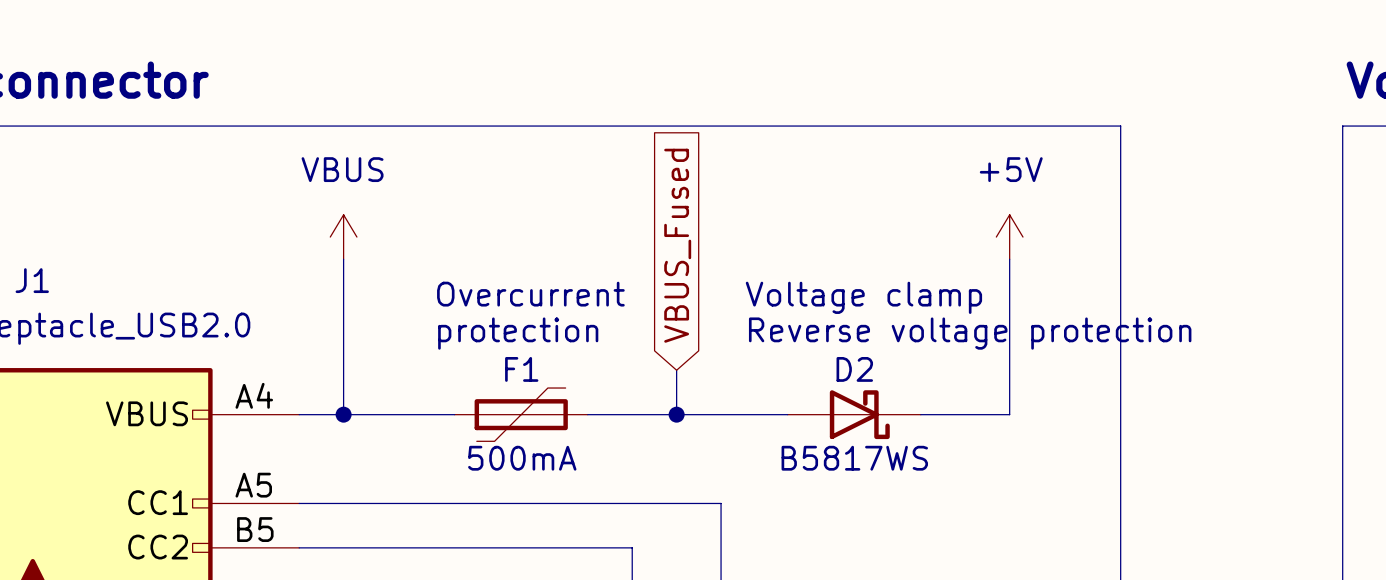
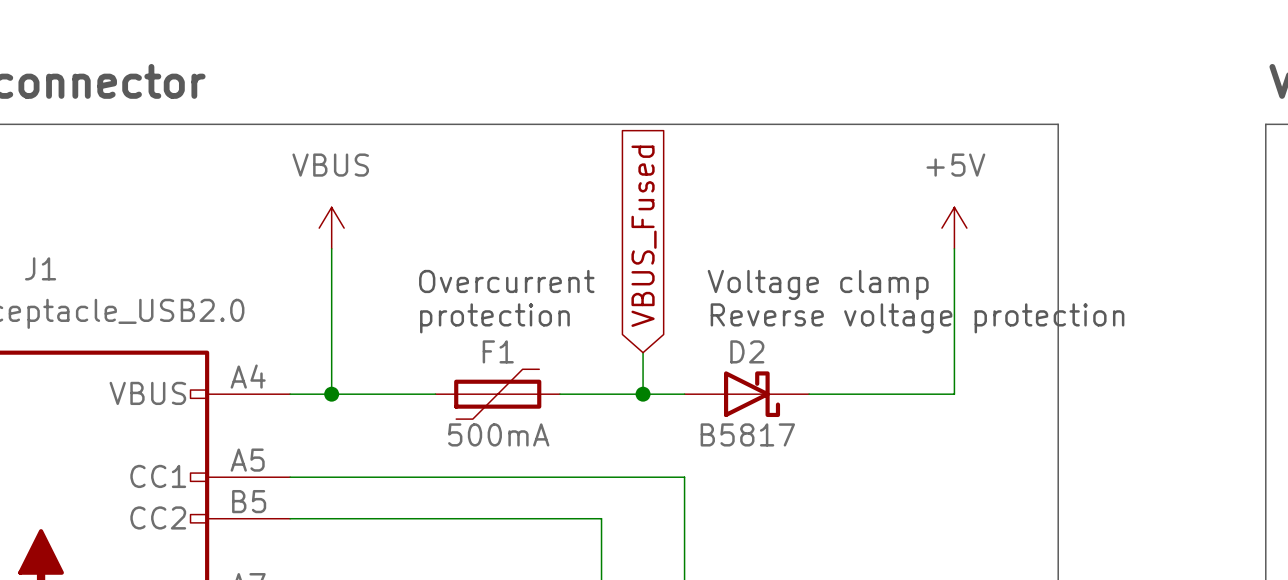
D2 position: (854, 414) -> (746, 394)
D2 value: B5817WS (854, 458) -> B5817 (747, 434)

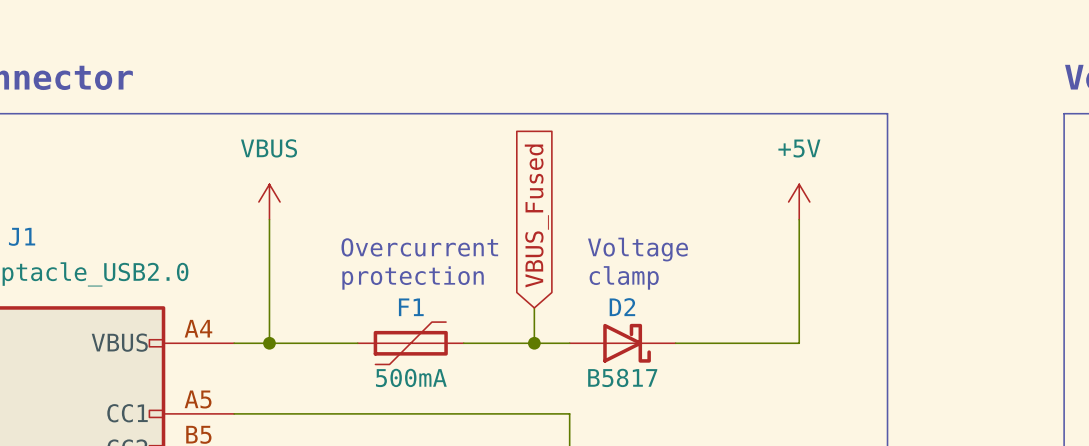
text: Voltage clamp (818, 284) -> Voltage (637, 249)
text: Reverse voltage protection (917, 318) -> clamp (624, 277)

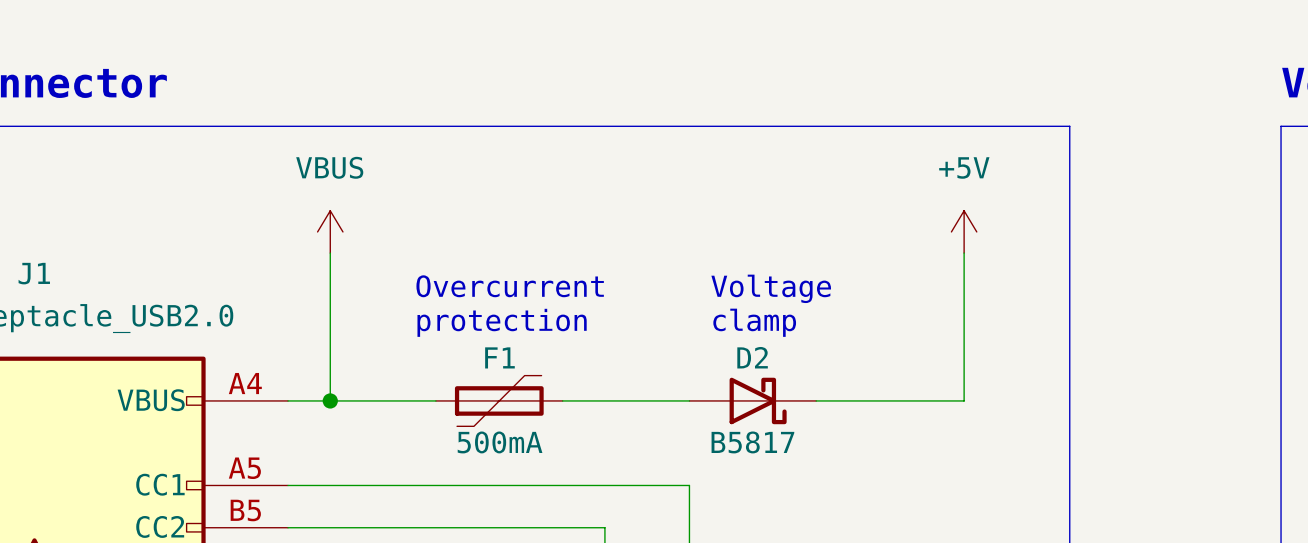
global label: VBUS_Fused (536, 215) -> none
wire: (534, 307) (534, 343) -> none
junction: (534, 343) -> none

